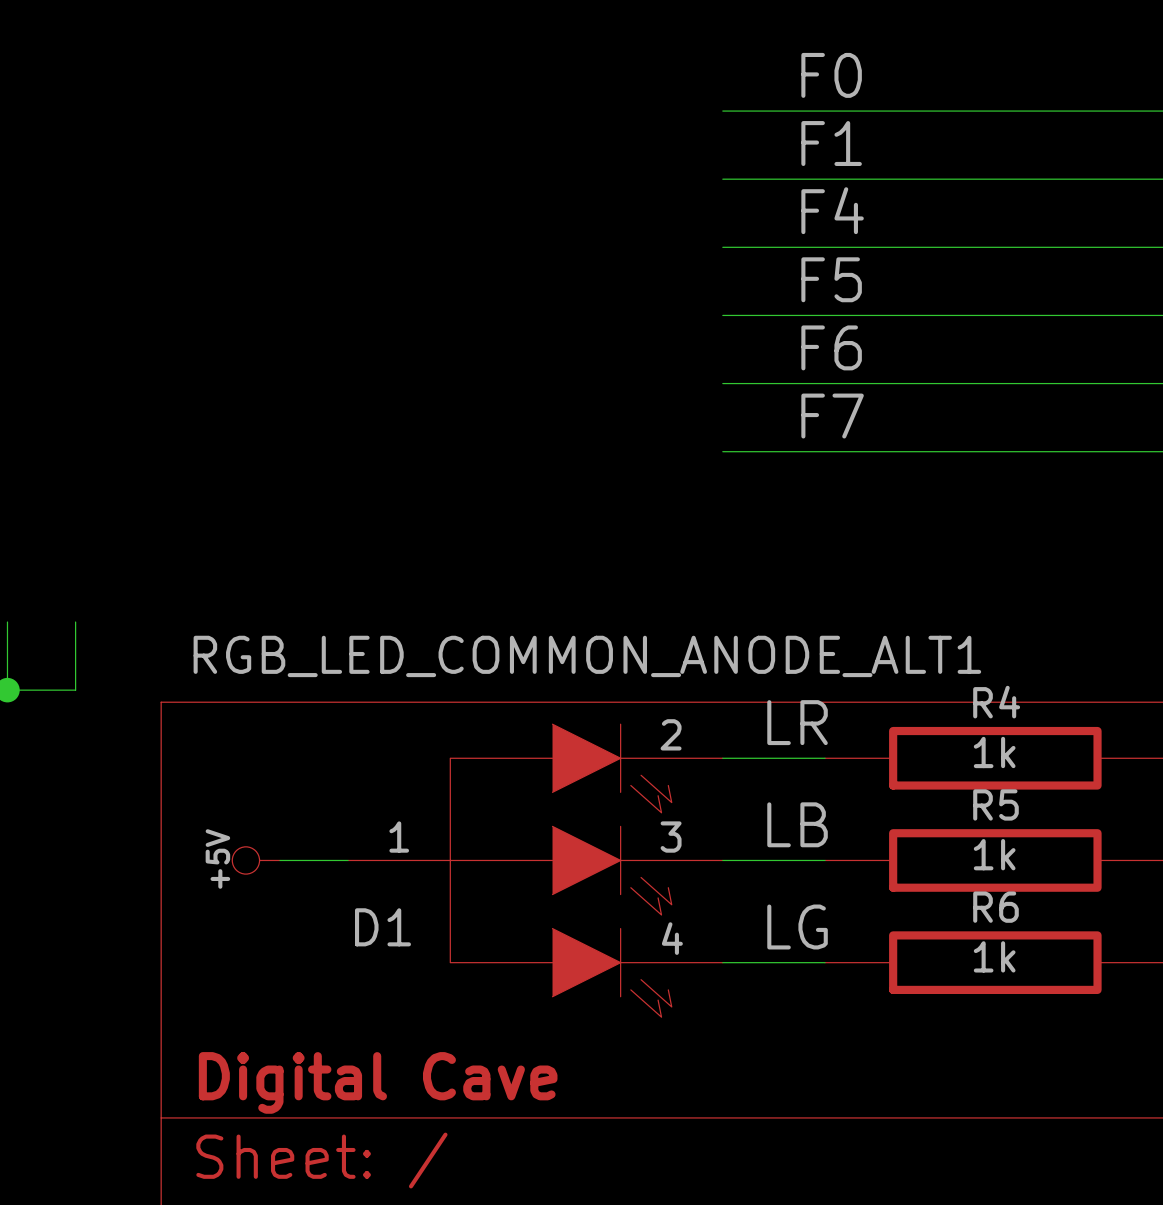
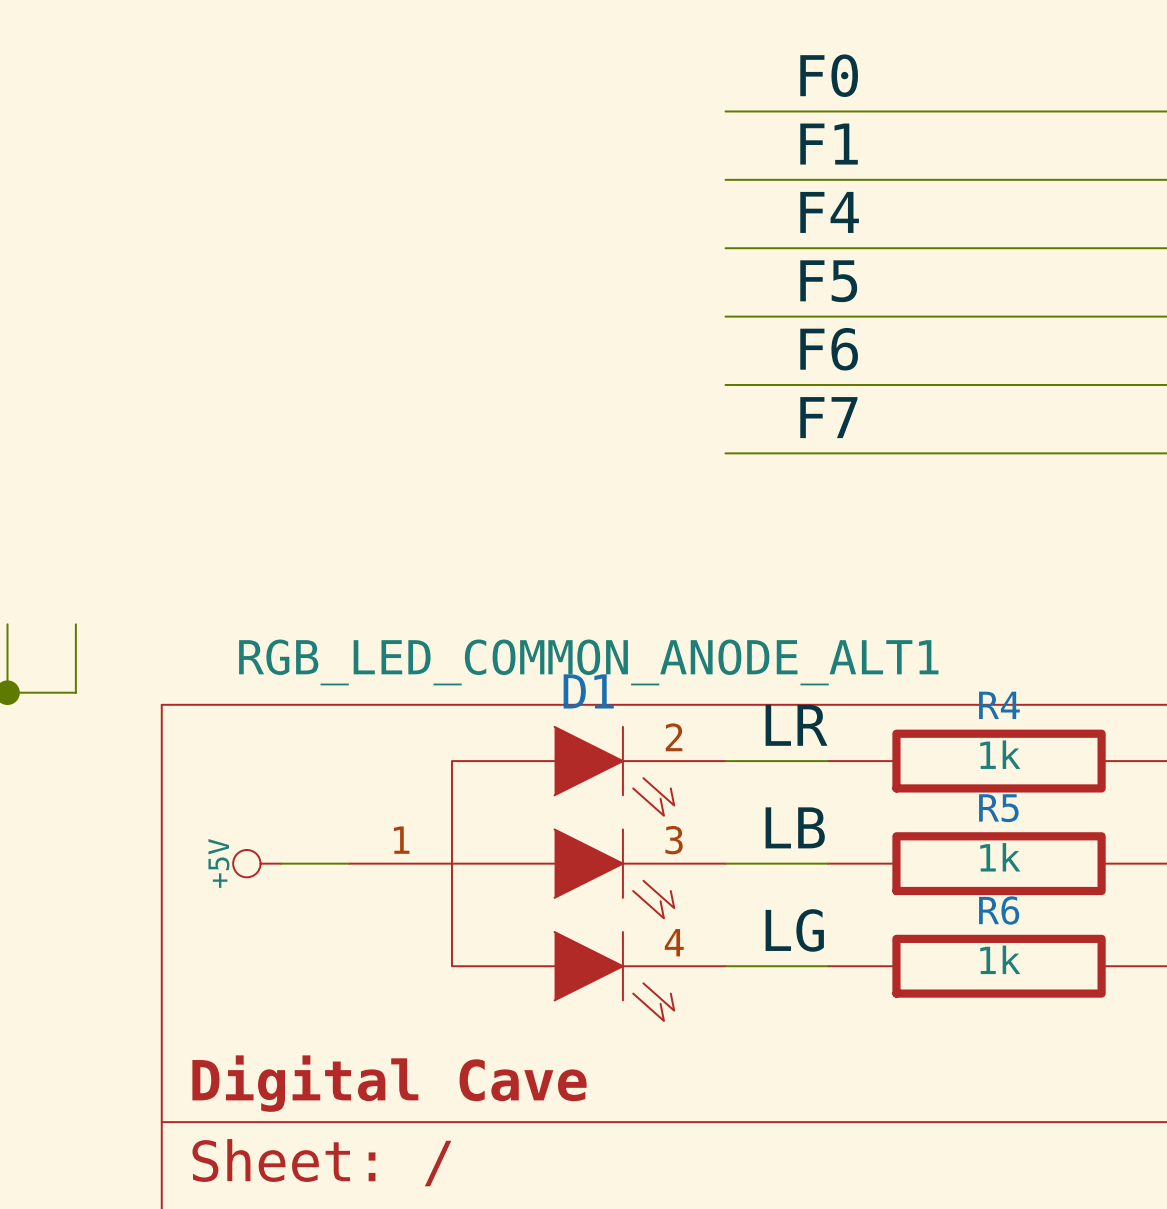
D1 name position: D1 (382, 927) -> D1 (588, 691)

